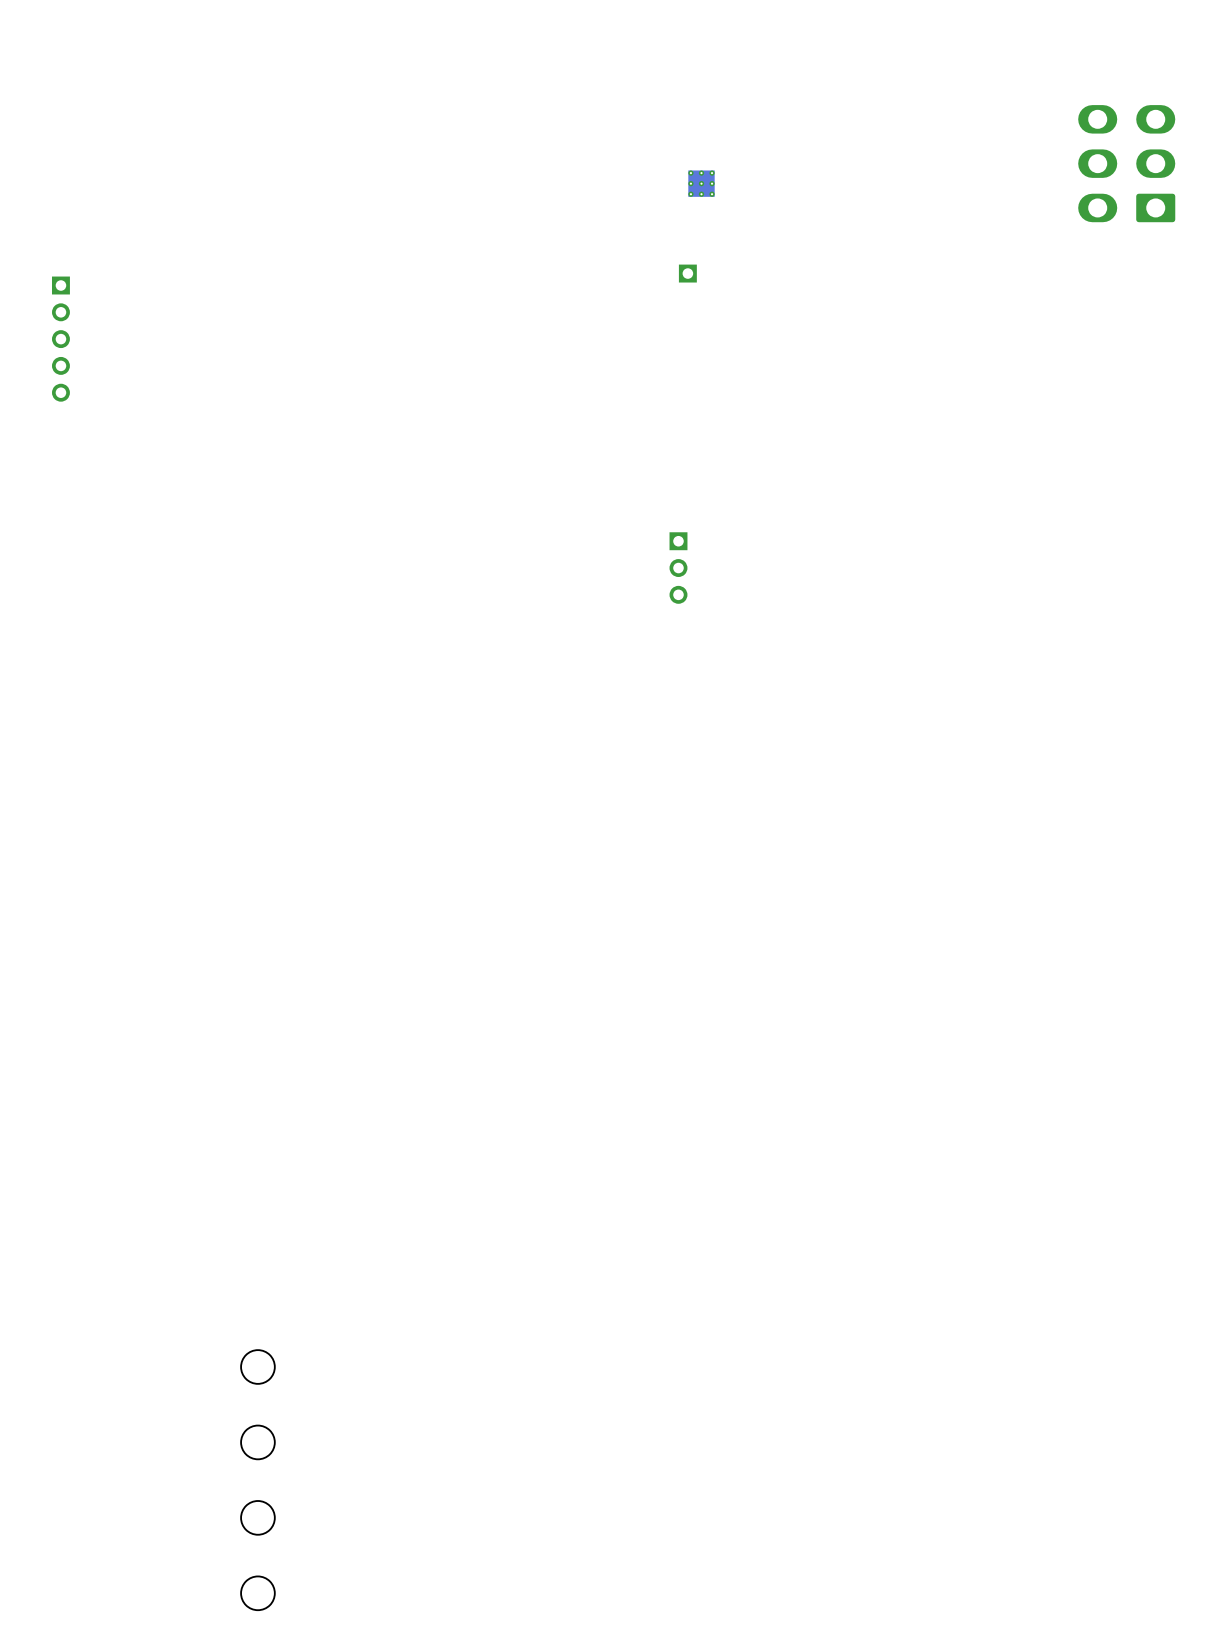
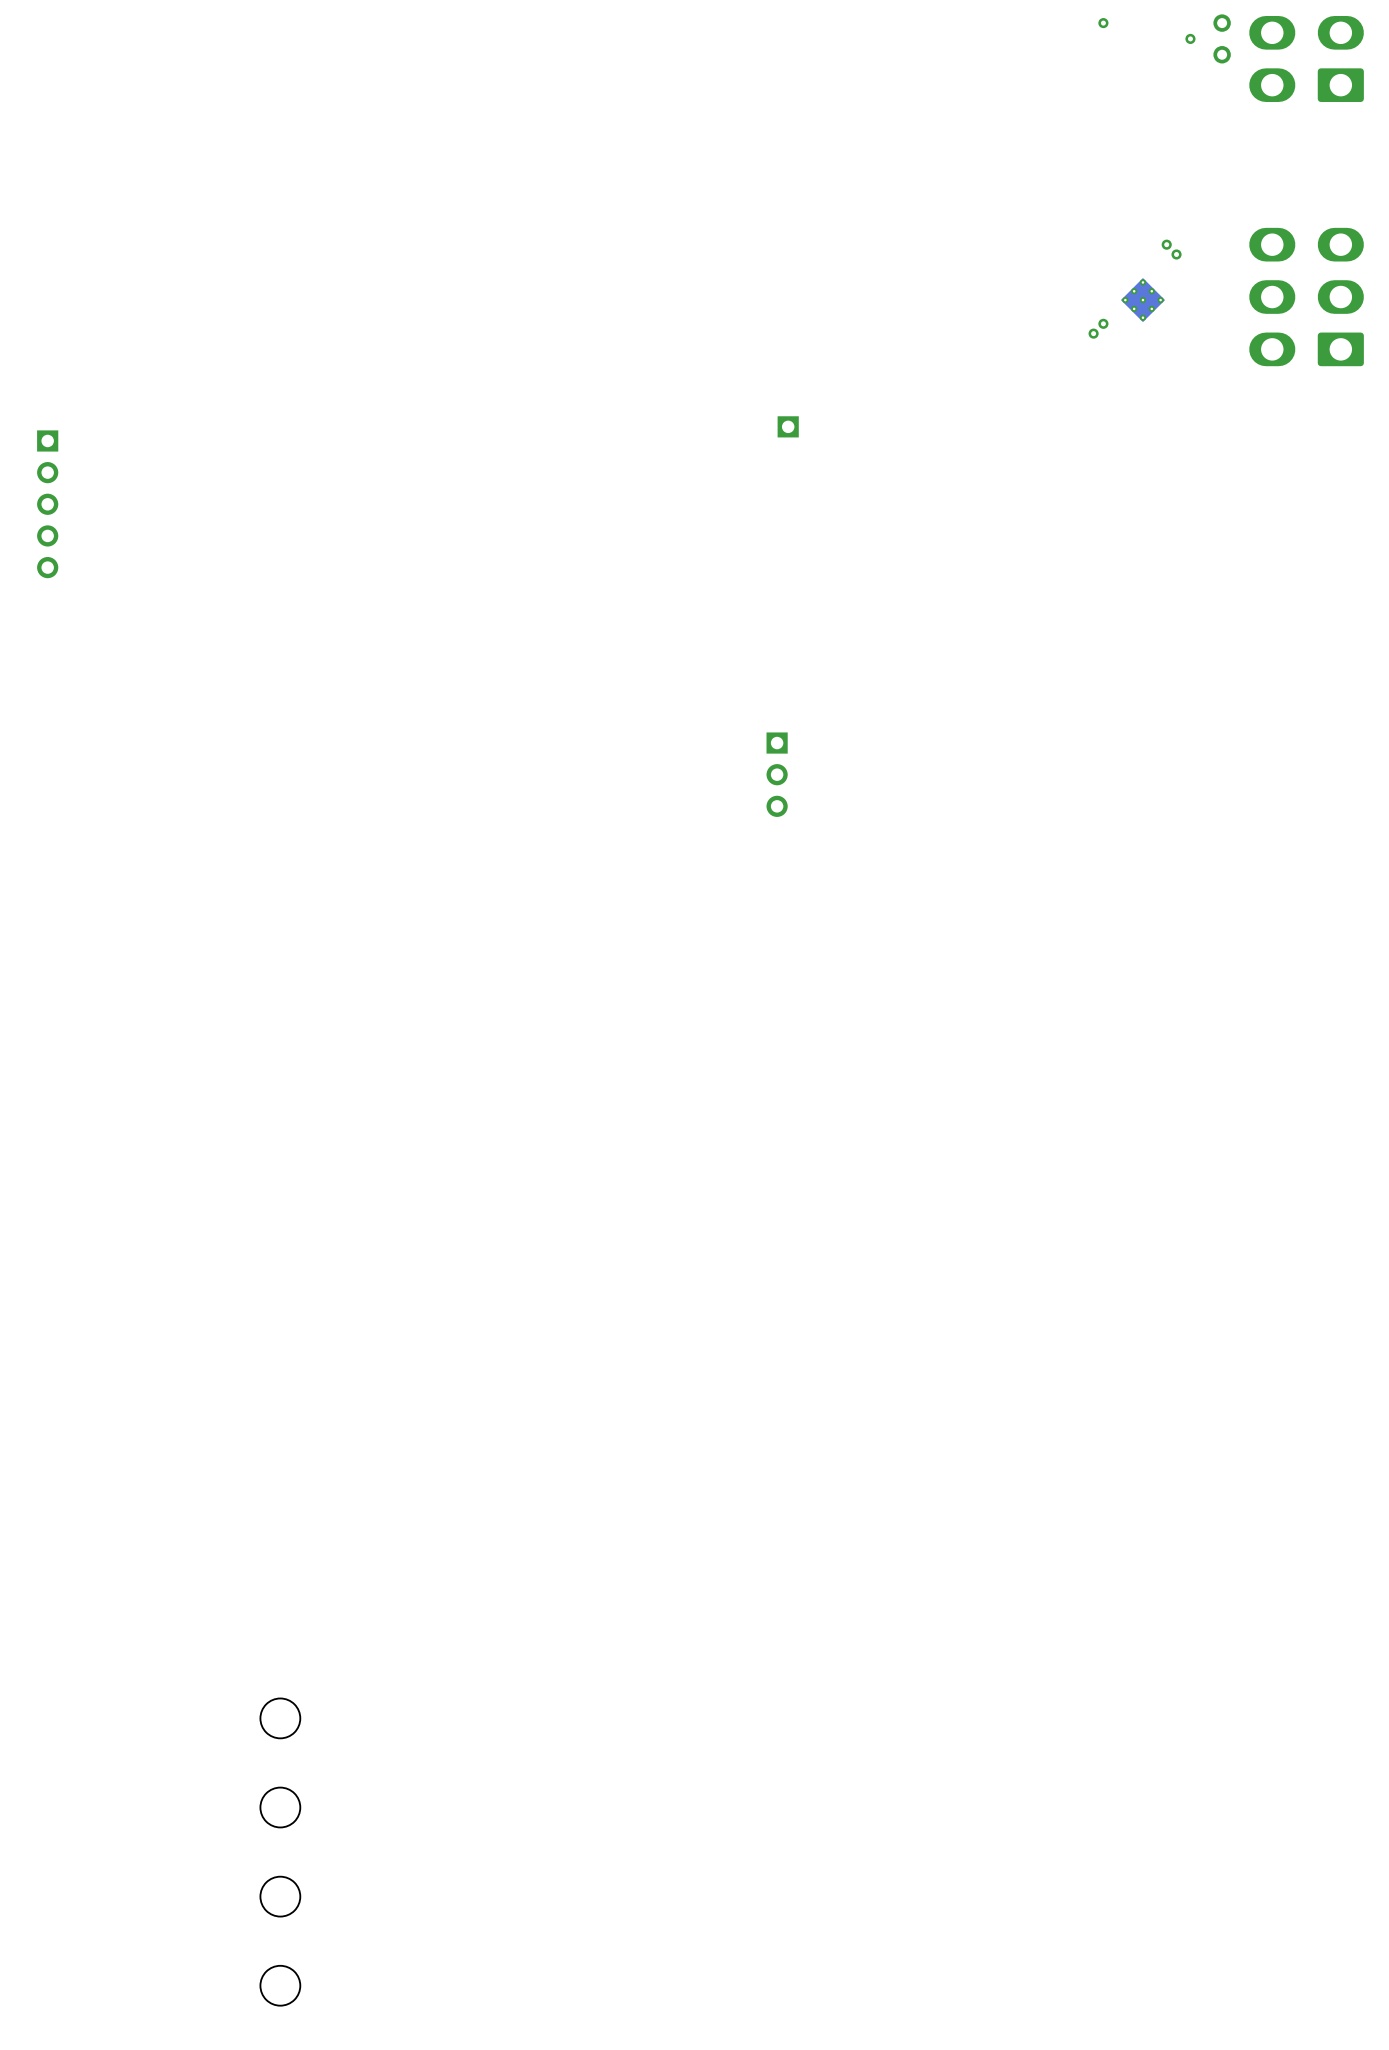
via: none -> (1166, 244)
via: none -> (1176, 254)
part: none -> (1142, 300)
part: (701, 183) -> none
via: none -> (1103, 323)
via: none -> (1093, 333)

